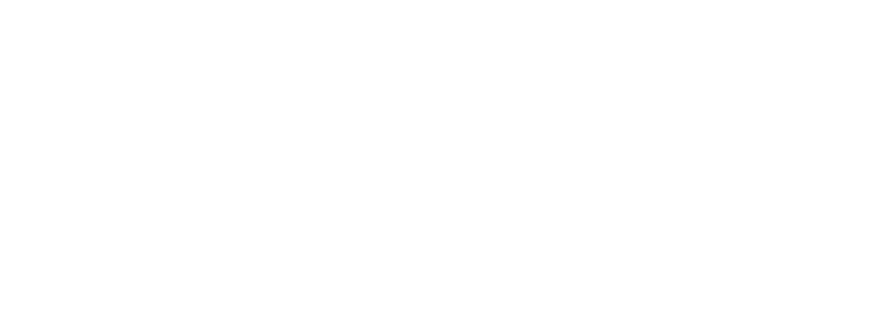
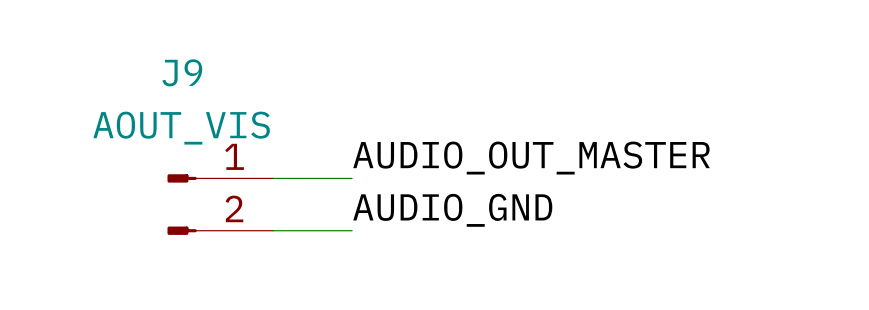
label: none -> AUDIO_OUT_MASTER (531, 158)
wire: none -> (273, 178) (352, 178)
J9: none -> AOUT_VIS (220, 204)
label: none -> AUDIO_GND (452, 210)
wire: none -> (273, 230) (352, 230)

